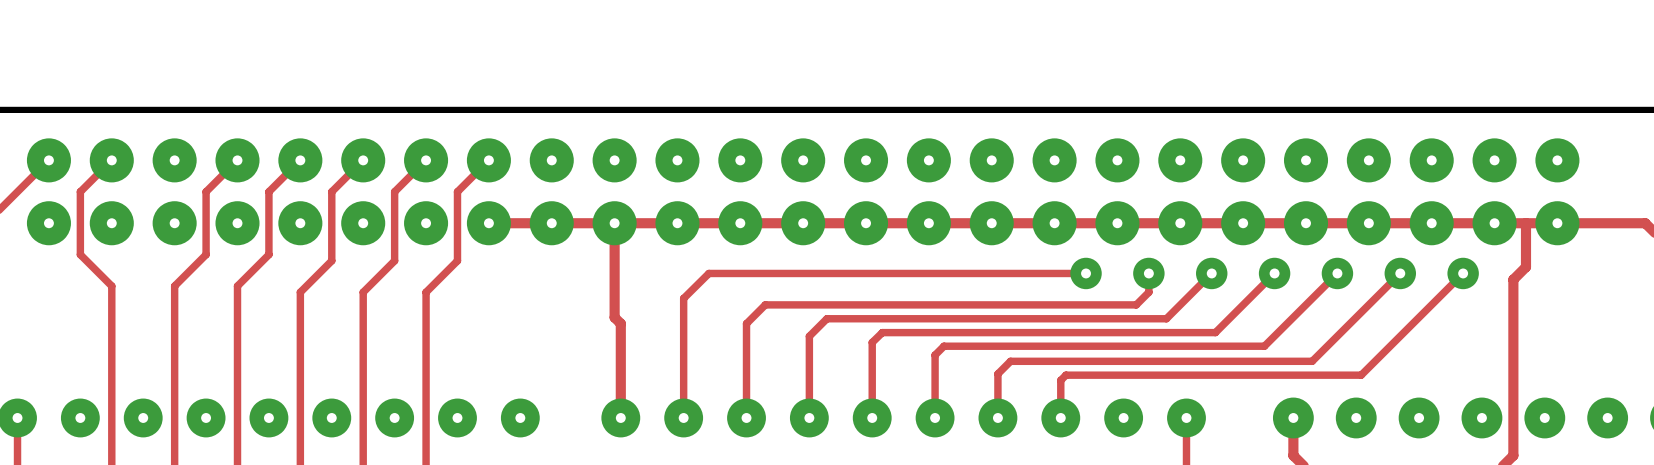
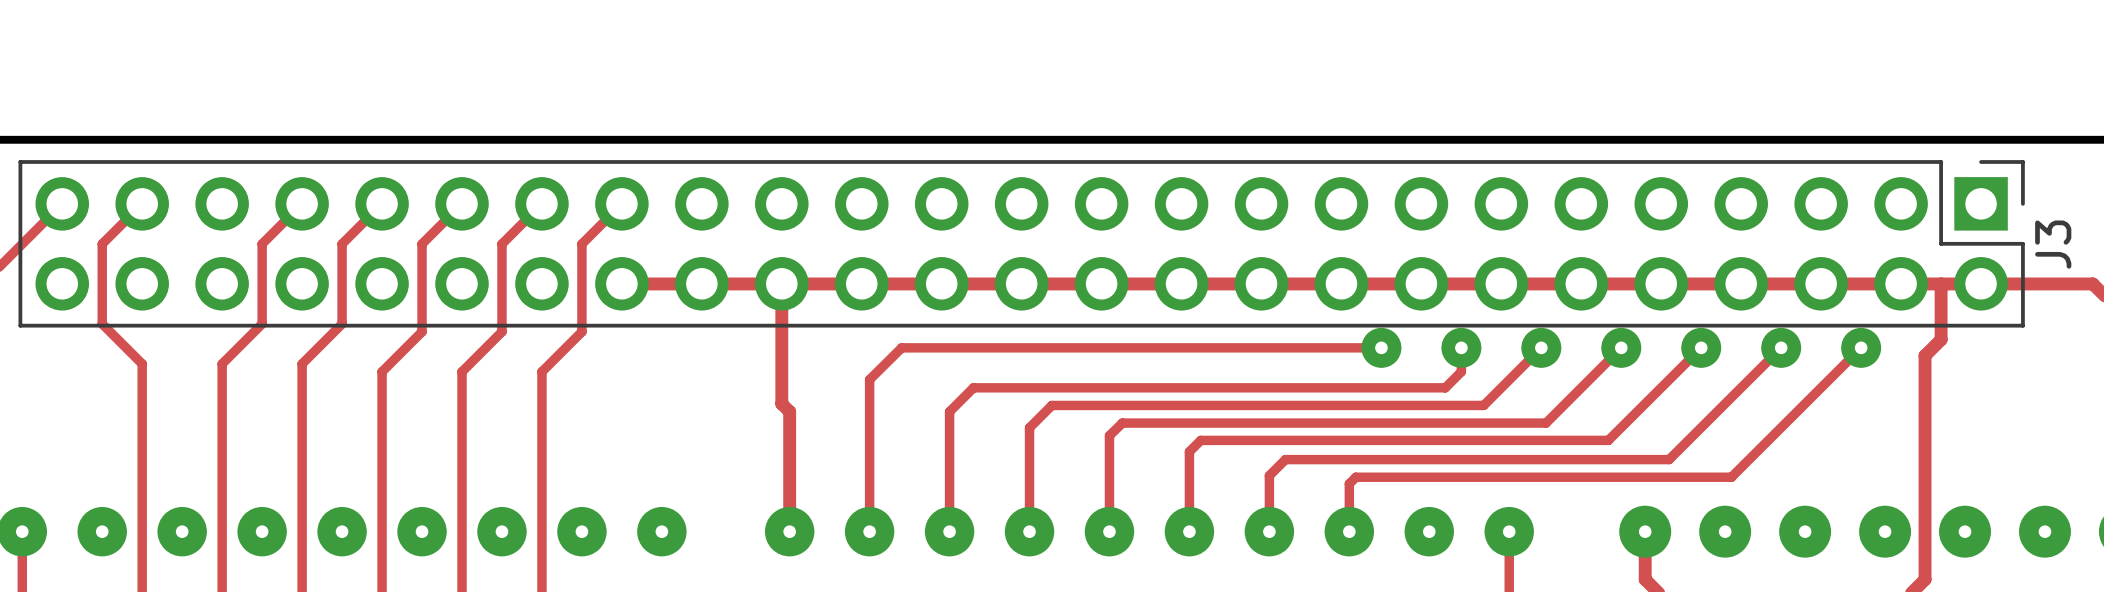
via: (48, 160) -> none
via: (111, 160) -> none
via: (174, 160) -> none
via: (237, 160) -> none
via: (300, 160) -> none
via: (363, 160) -> none
via: (426, 160) -> none
via: (488, 160) -> none
via: (551, 160) -> none
via: (614, 160) -> none
via: (677, 160) -> none
via: (740, 160) -> none
via: (803, 160) -> none
via: (866, 160) -> none
via: (928, 160) -> none
via: (991, 160) -> none
via: (1054, 160) -> none
via: (1117, 160) -> none
via: (1180, 160) -> none
via: (1243, 160) -> none
via: (1306, 160) -> none
via: (1368, 160) -> none
via: (1431, 160) -> none
via: (1494, 160) -> none
via: (1557, 160) -> none
J3: none -> (1021, 243)
via: (48, 223) -> none
via: (111, 223) -> none
via: (174, 223) -> none
via: (237, 223) -> none
via: (300, 223) -> none
via: (363, 223) -> none
via: (426, 223) -> none
via: (488, 223) -> none
via: (551, 223) -> none
via: (614, 223) -> none
via: (677, 223) -> none
via: (740, 223) -> none
via: (803, 223) -> none
via: (866, 223) -> none
via: (928, 223) -> none
via: (991, 223) -> none
via: (1054, 223) -> none
via: (1117, 223) -> none
via: (1180, 223) -> none
via: (1243, 223) -> none
via: (1306, 223) -> none
via: (1368, 223) -> none
via: (1431, 223) -> none
via: (1494, 223) -> none
via: (1557, 223) -> none

